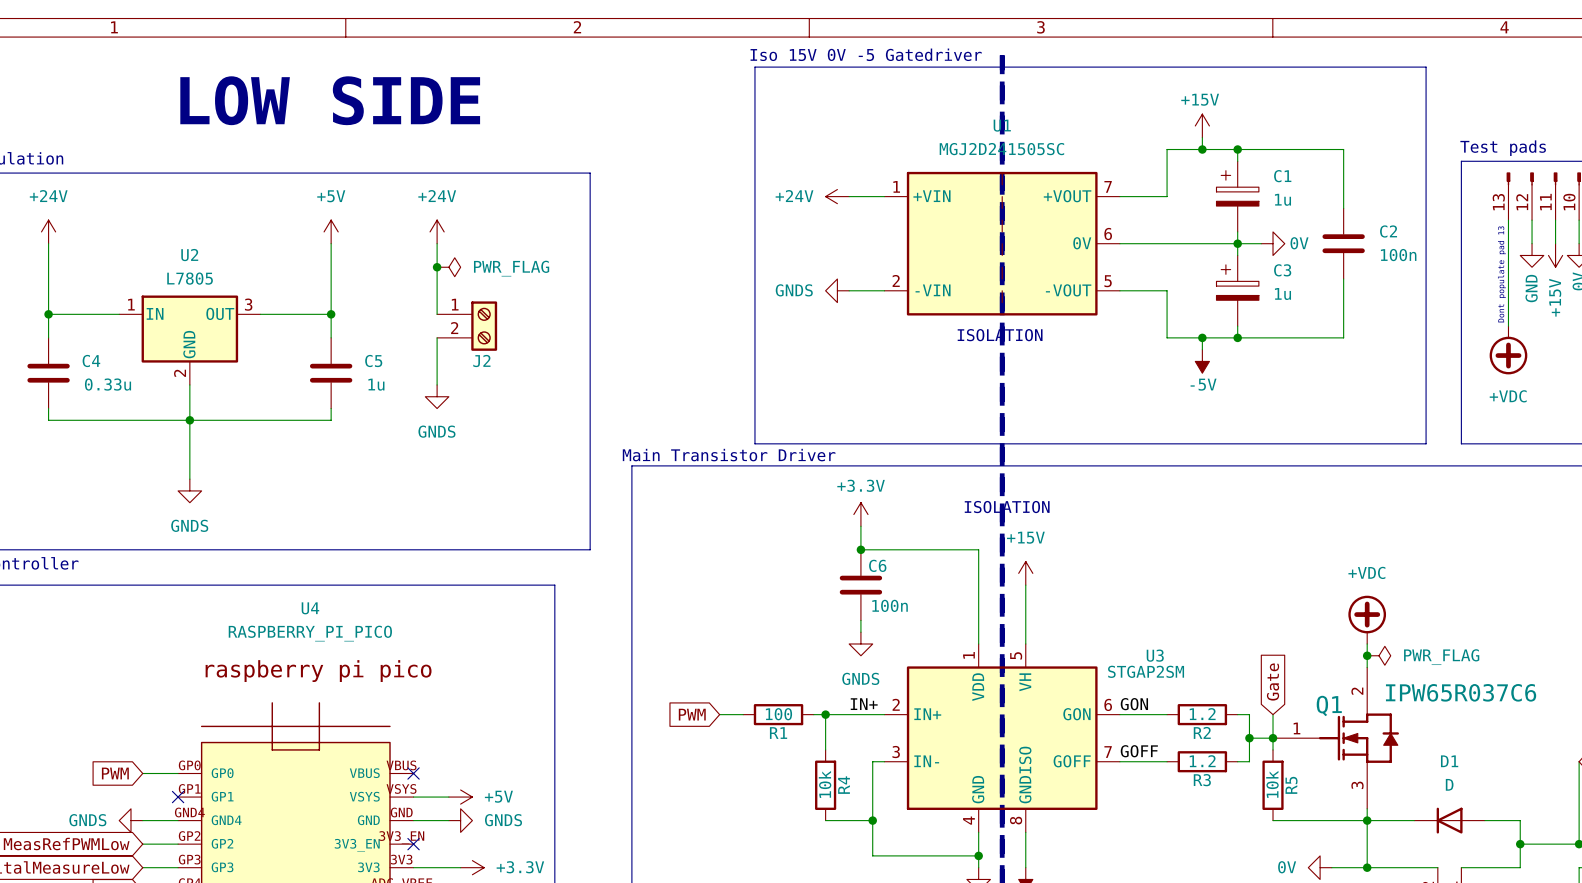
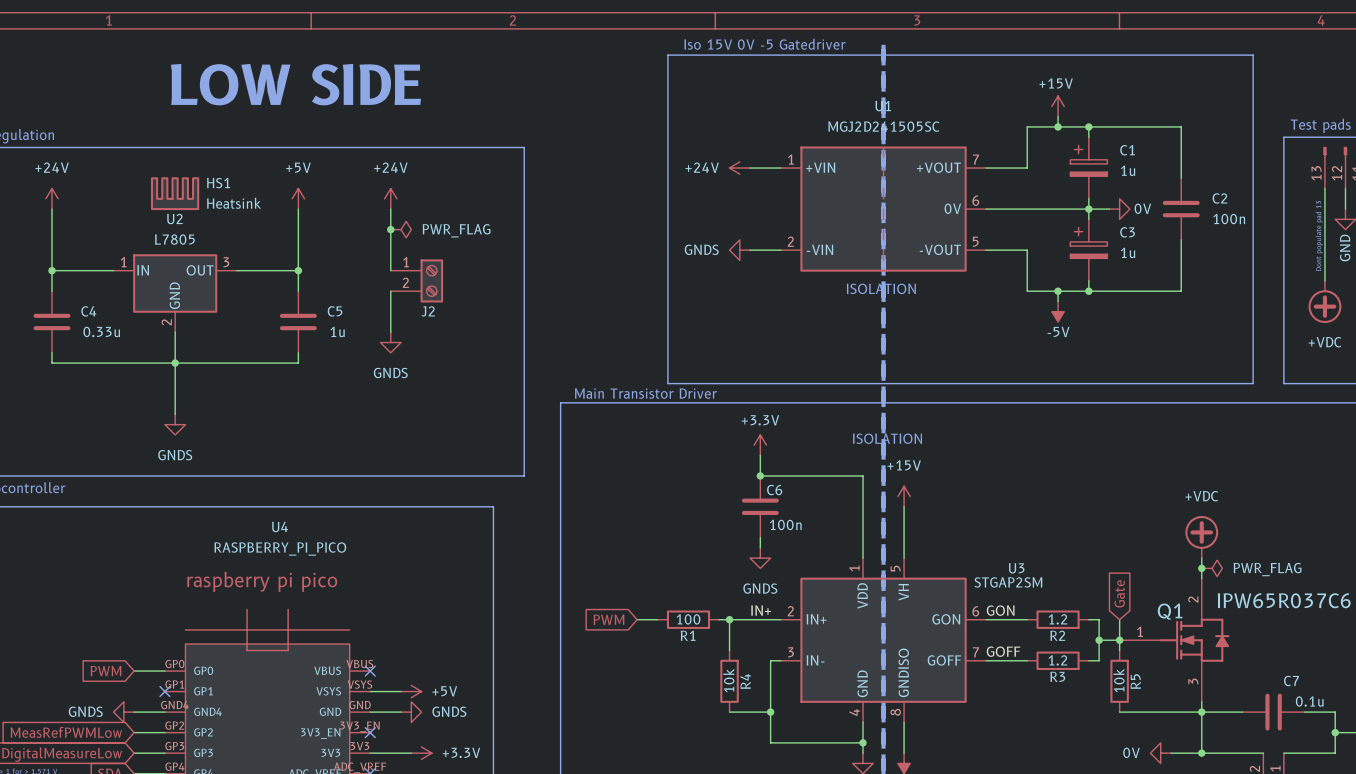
HS1: none -> Heatsink (175, 193)
D1: D (1449, 820) -> none
C7: none -> 0.1u (1273, 712)

